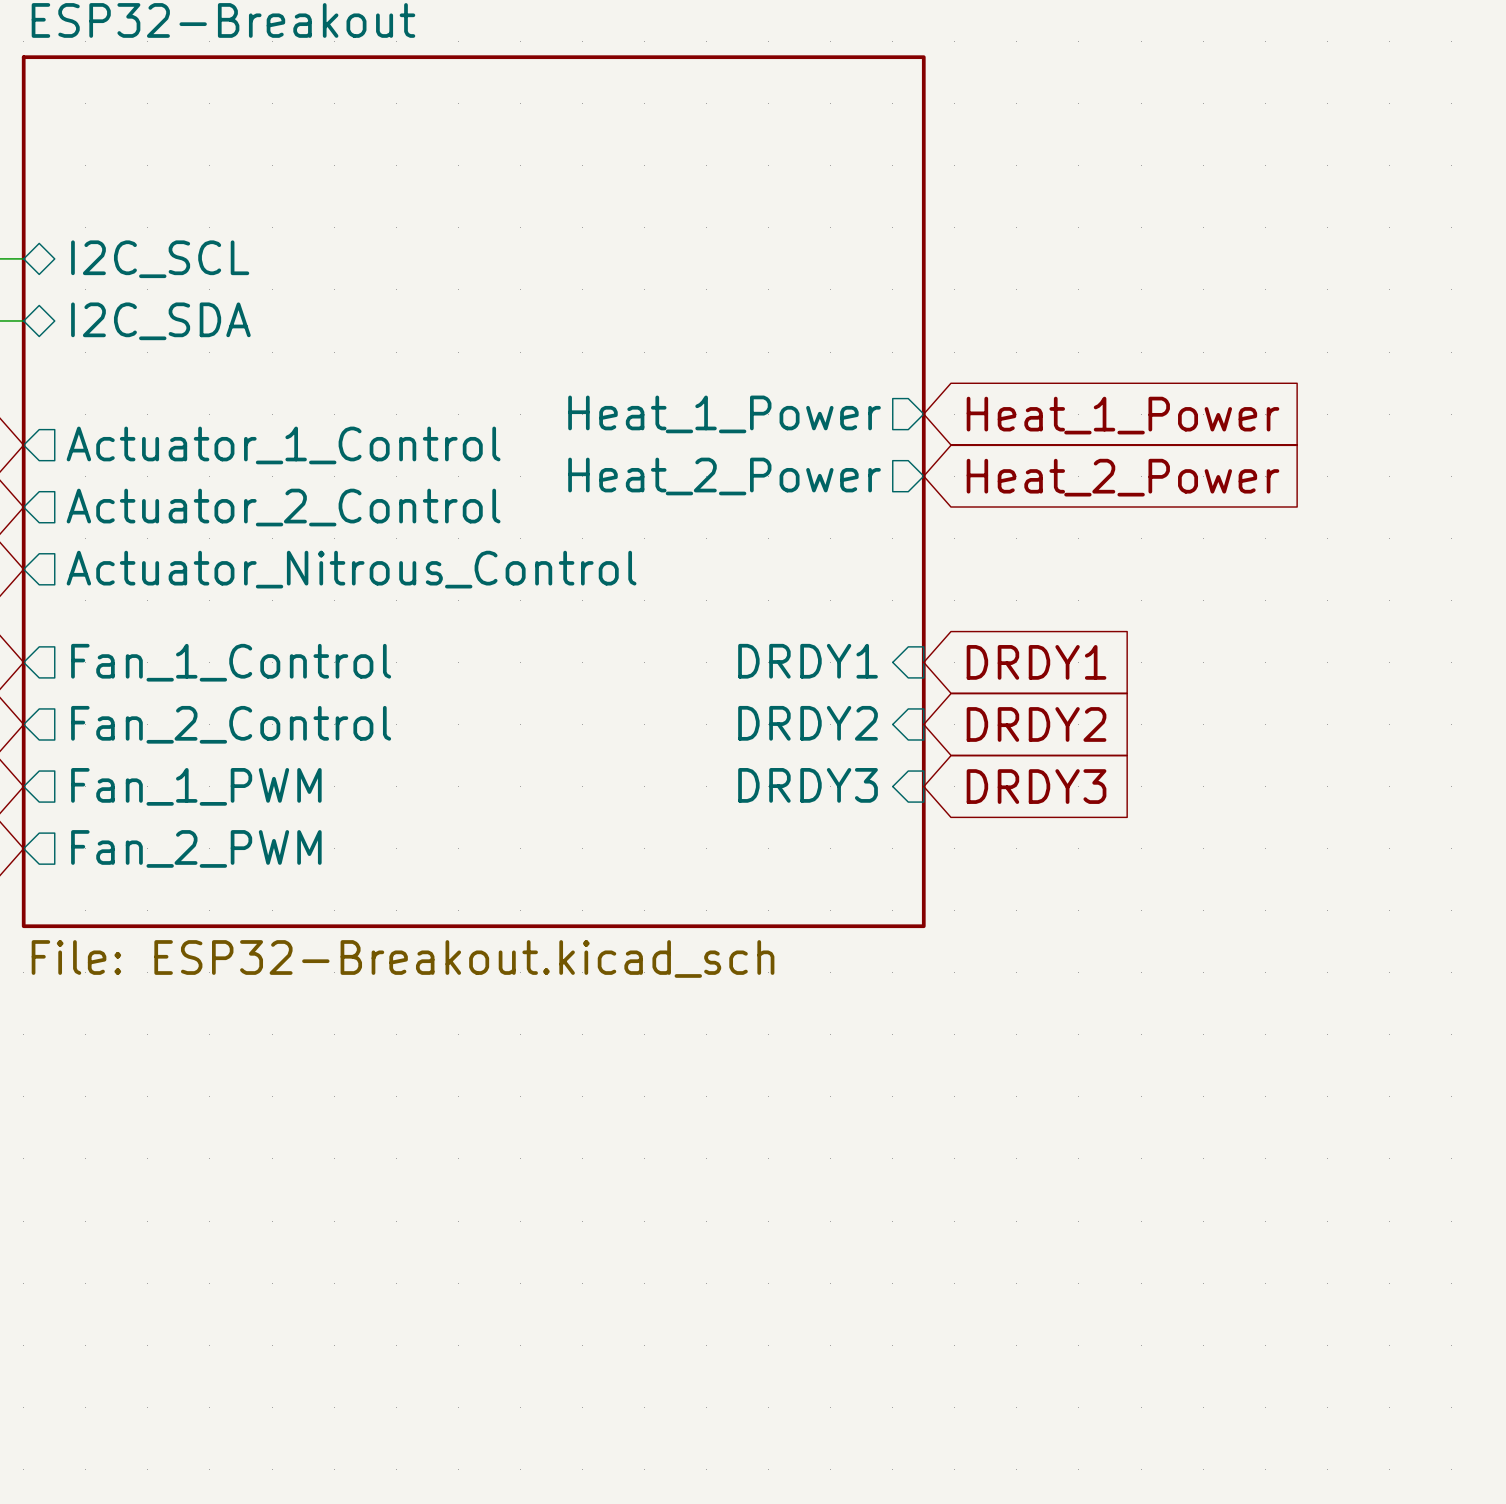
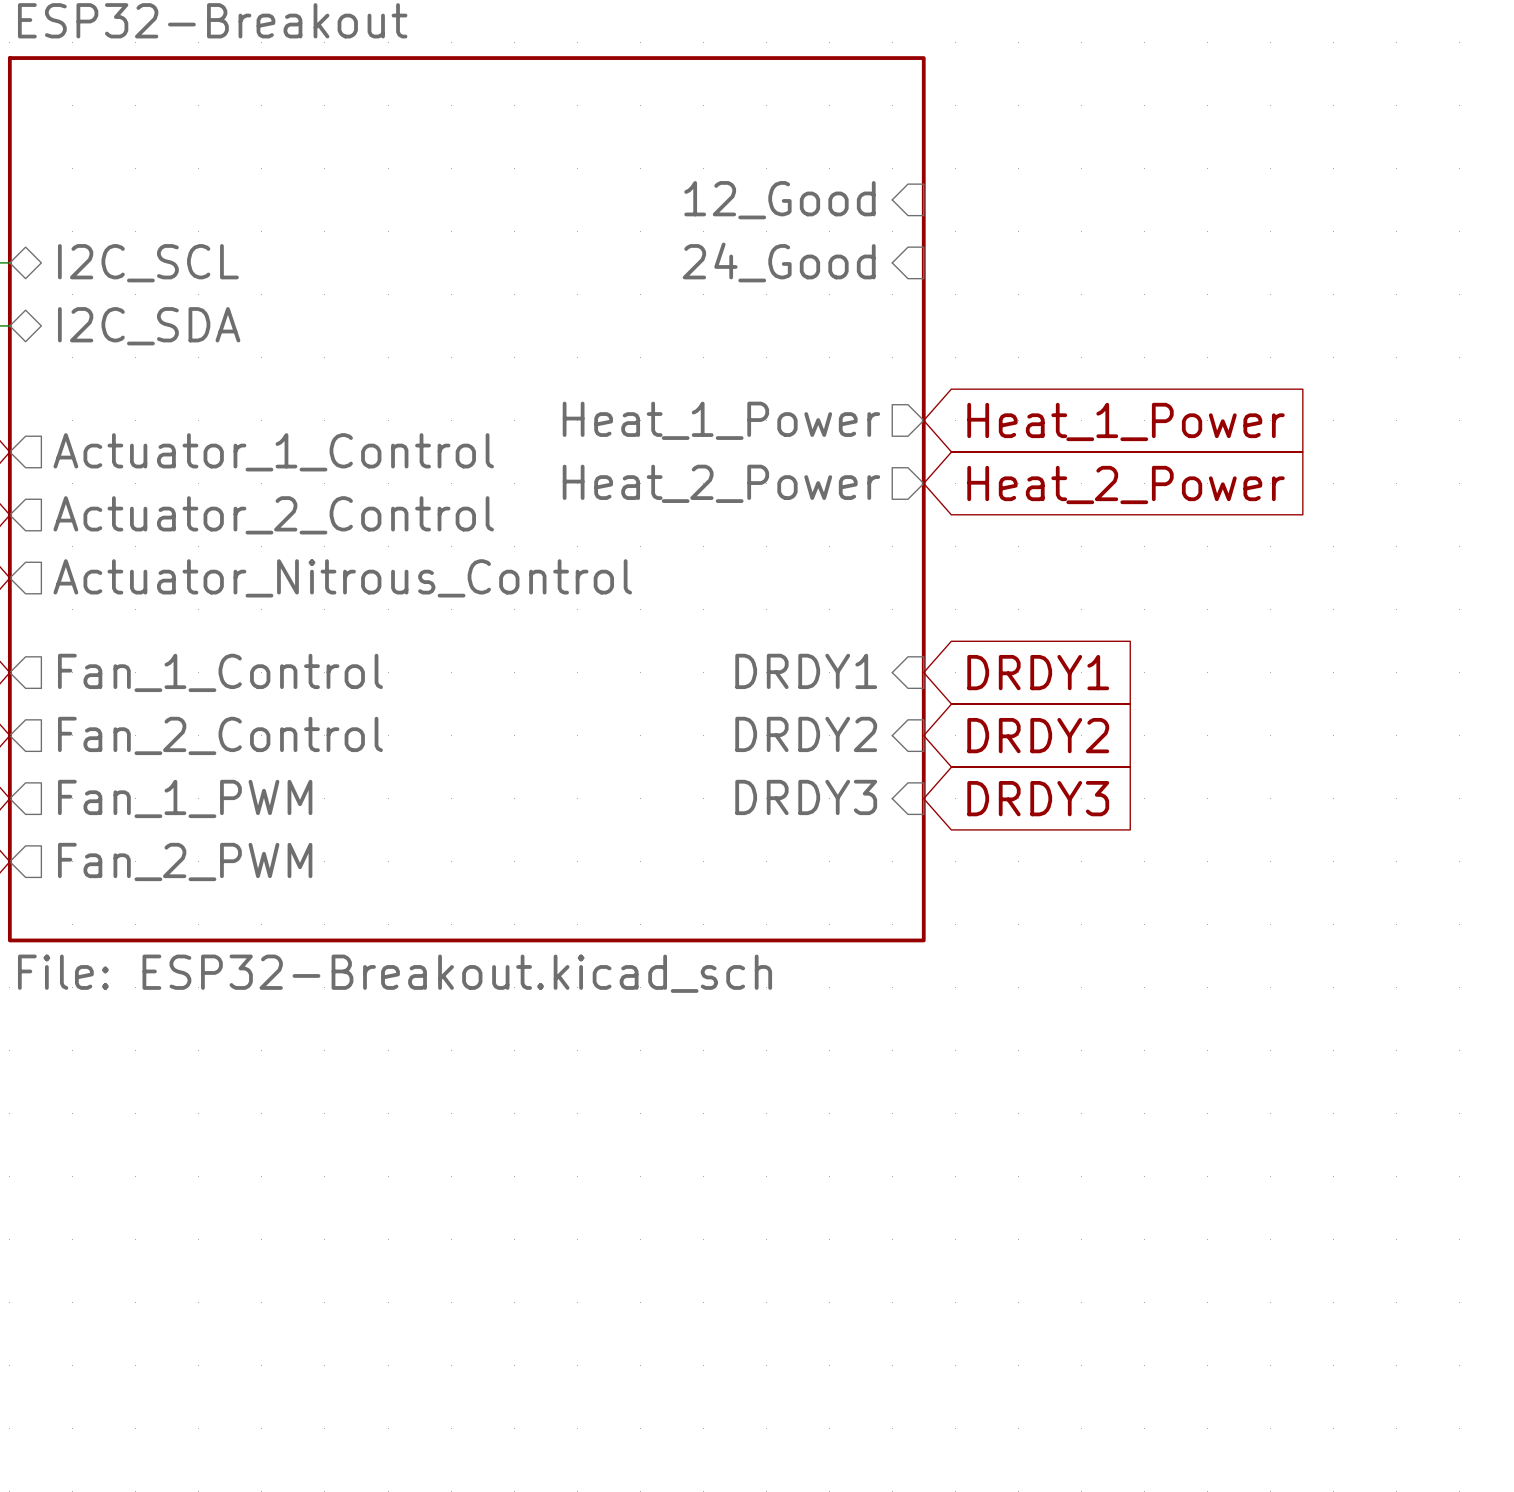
sheet pin: none -> 12_Good (779, 200)
sheet pin: none -> 24_Good (779, 262)

